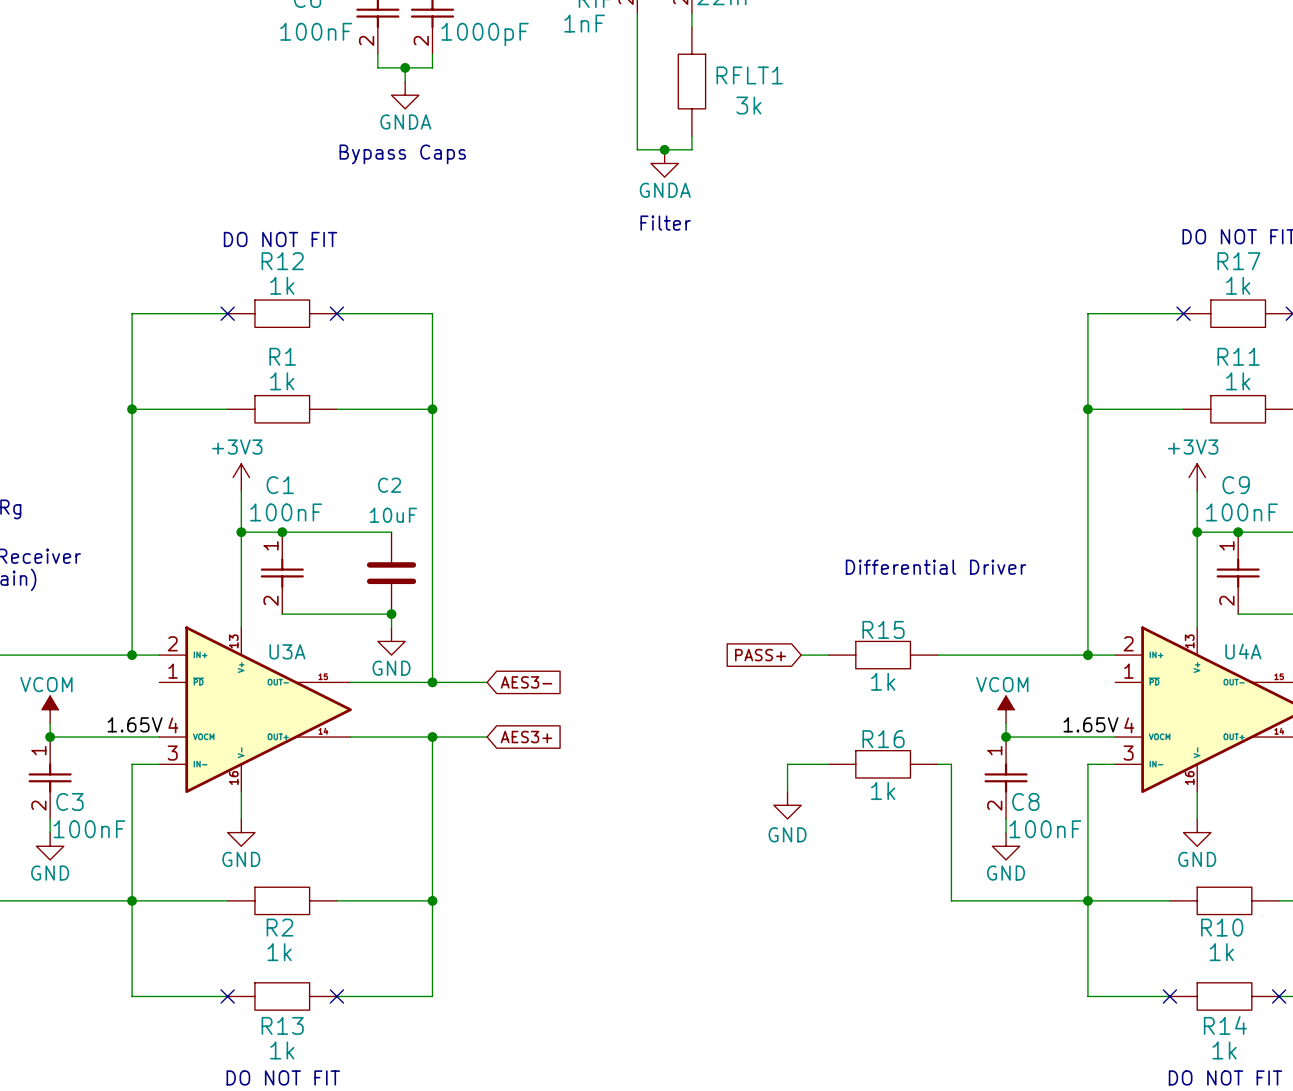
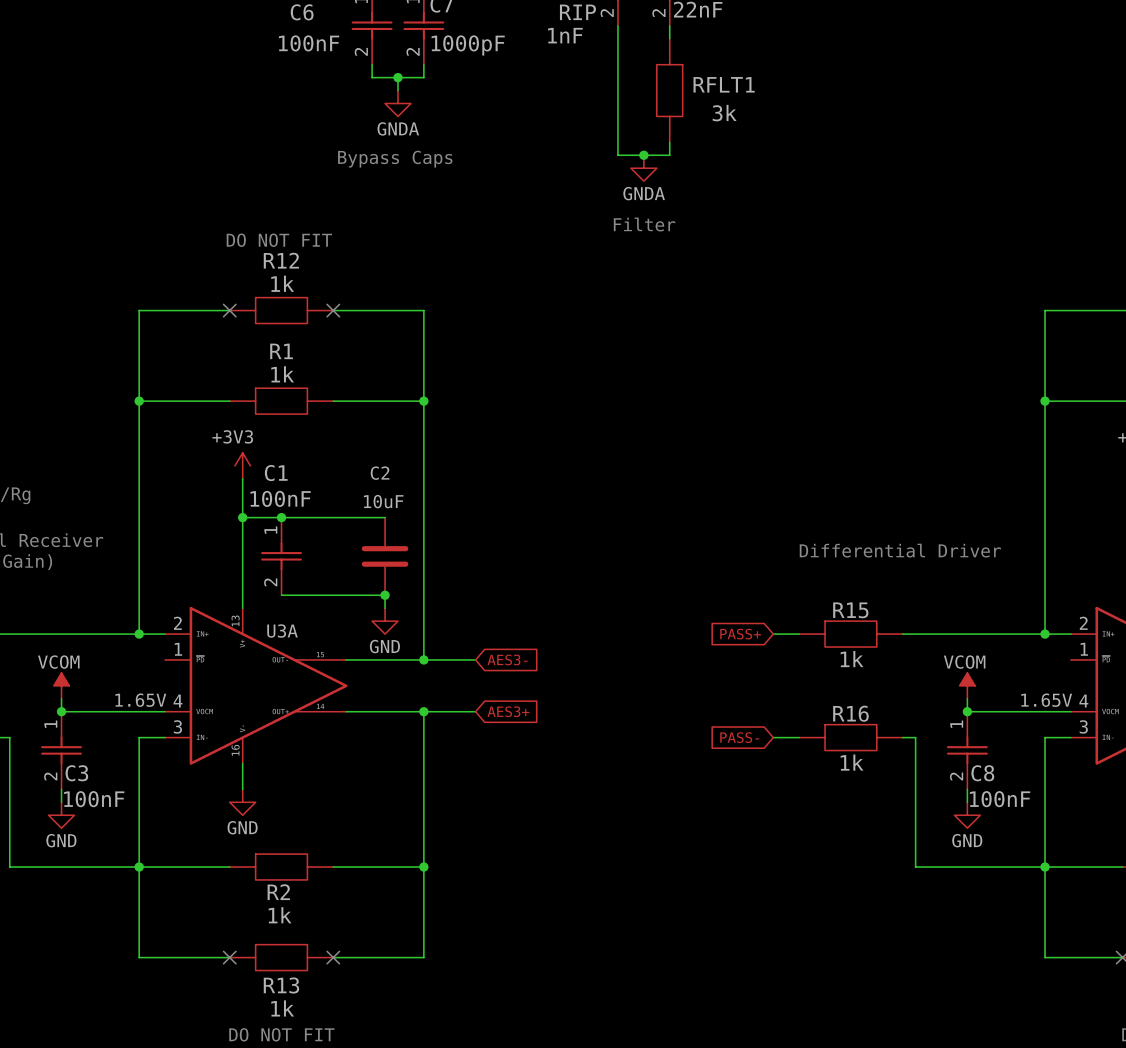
global label: none -> PASS- (739, 737)
wire: (801, 764) (787, 764) (787, 791) -> none
power symbol: GND (787, 805) -> none

